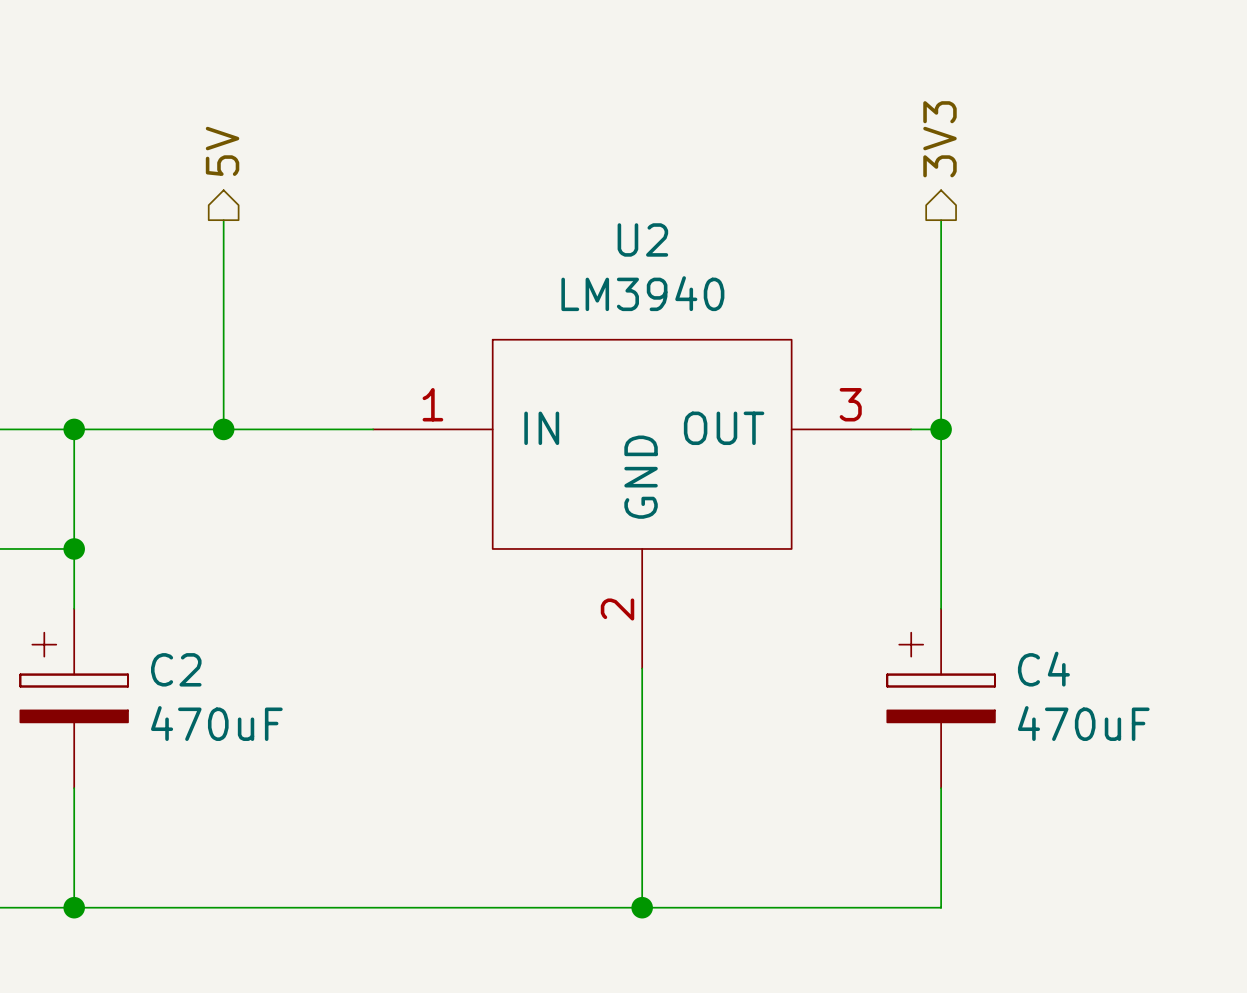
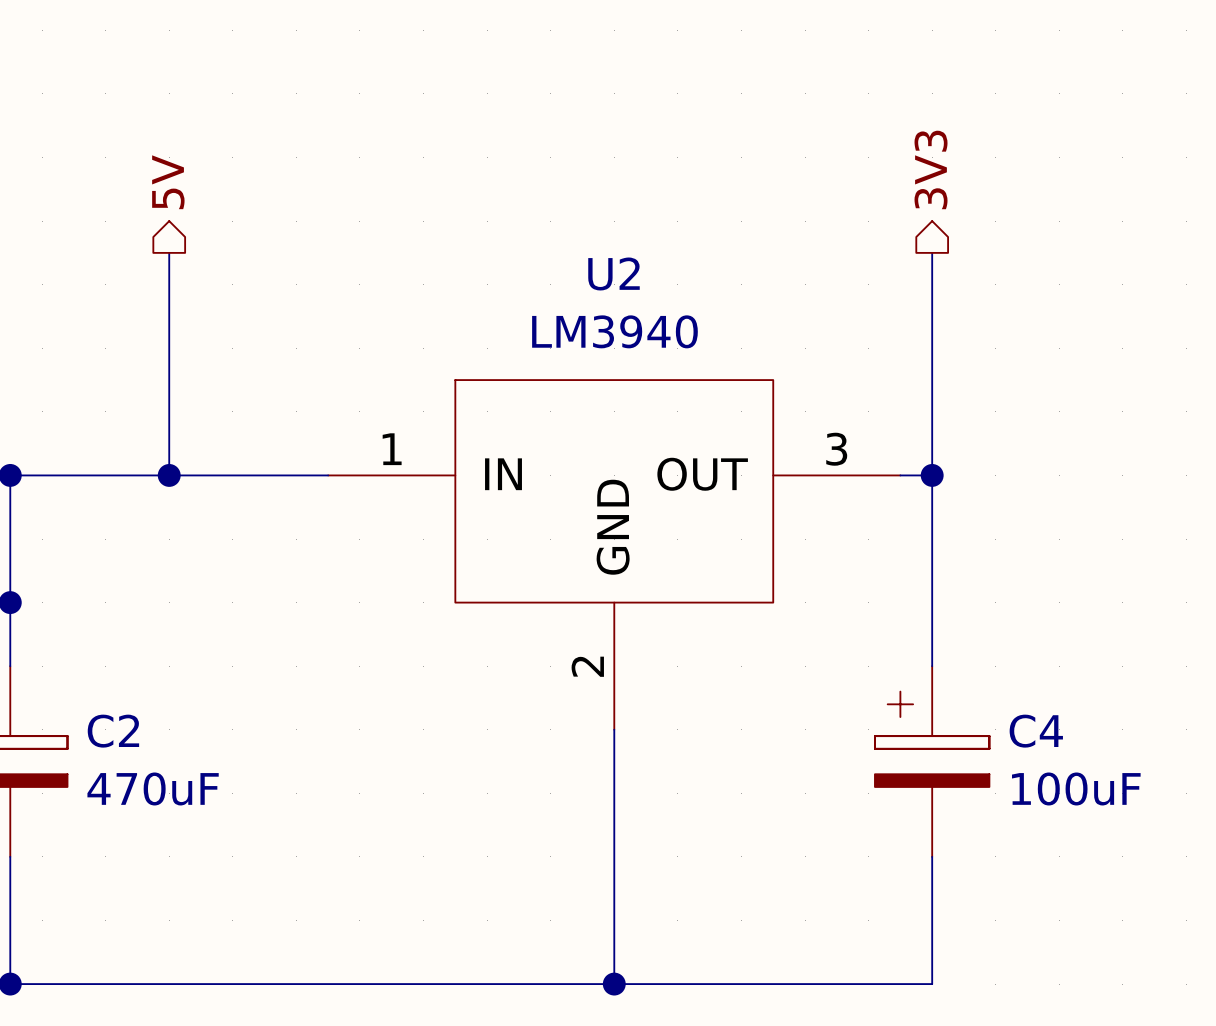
C4 value: 470uF (1083, 723) -> 100uF (1076, 788)

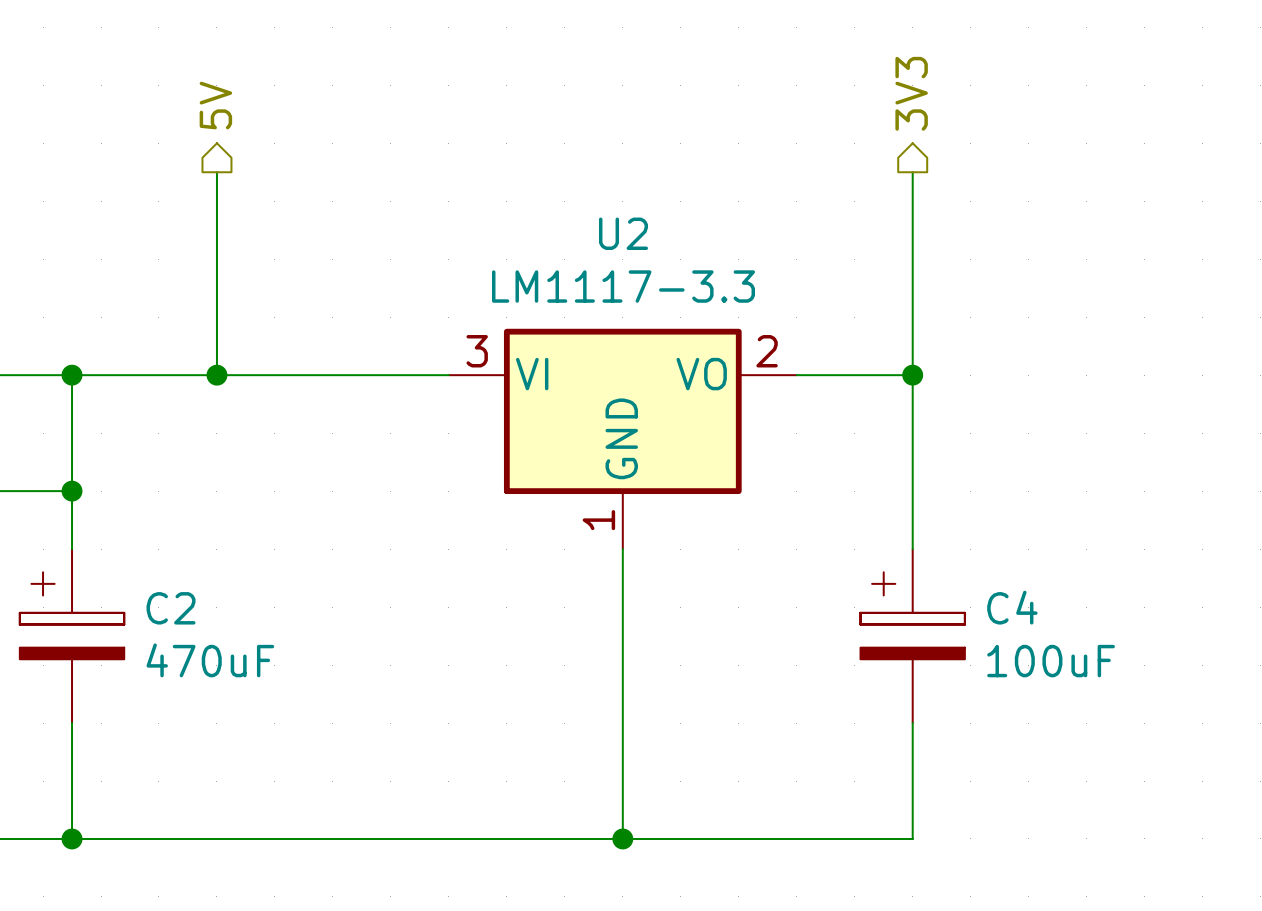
U2 name position: U2 (613, 273) -> U2 (623, 233)
U2 value: LM3940 (614, 331) -> LM1117-3.3 (623, 286)
U2 symbol: [328, 380, 901, 730] -> [448, 328, 797, 550]

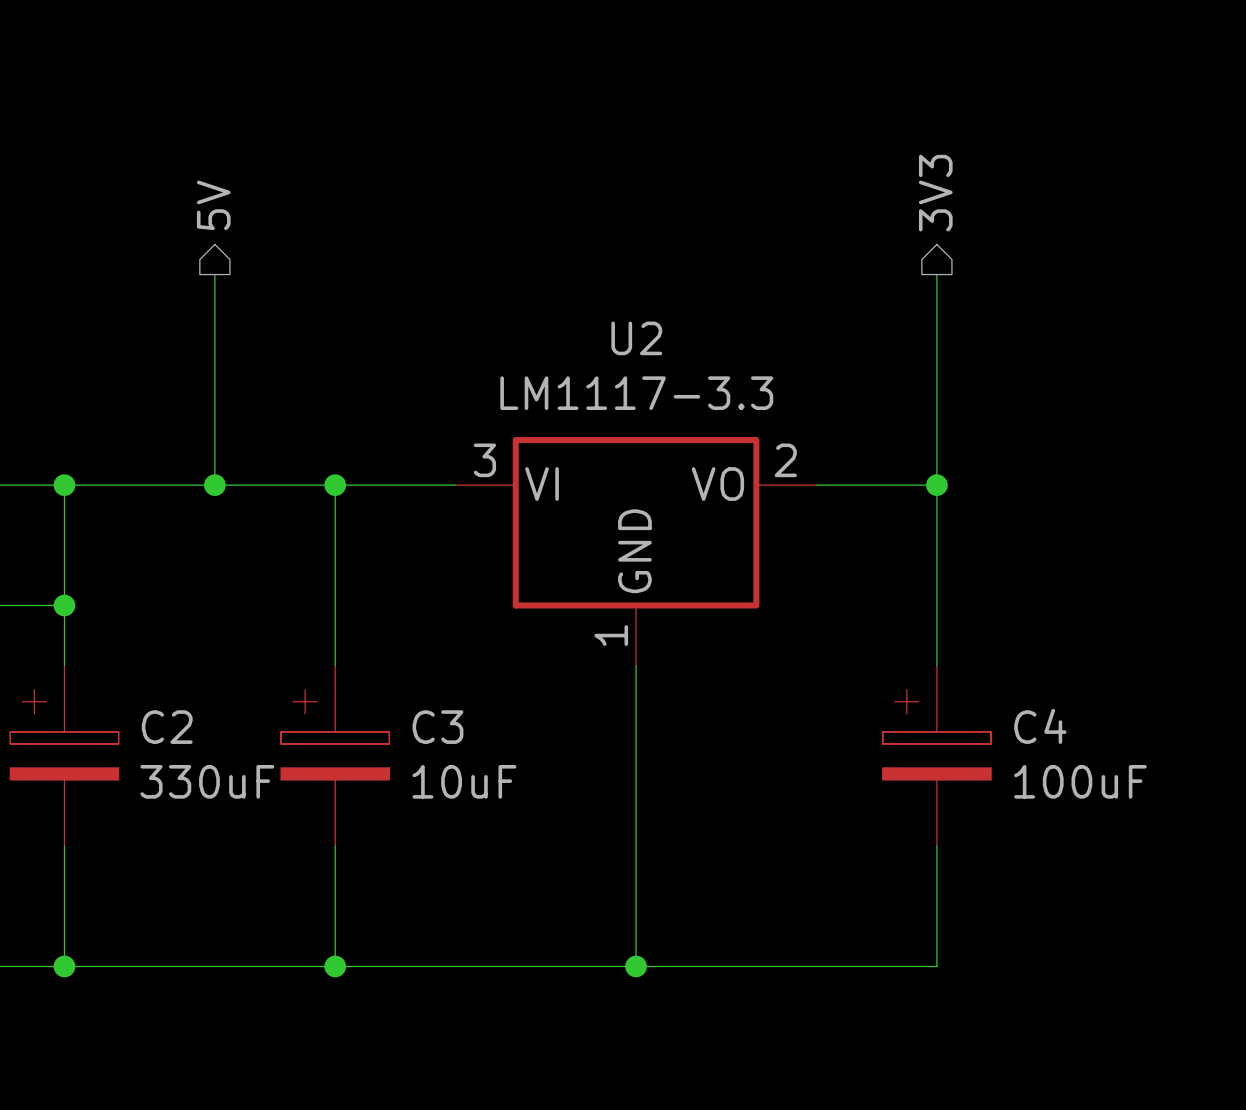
wire: none -> (335, 485) (335, 665)
junction: none -> (335, 485)
C3: none -> 10uF (335, 755)
C2 value: 470uF (210, 660) -> 330uF (207, 781)
wire: none -> (335, 846) (335, 966)
junction: none -> (335, 966)

